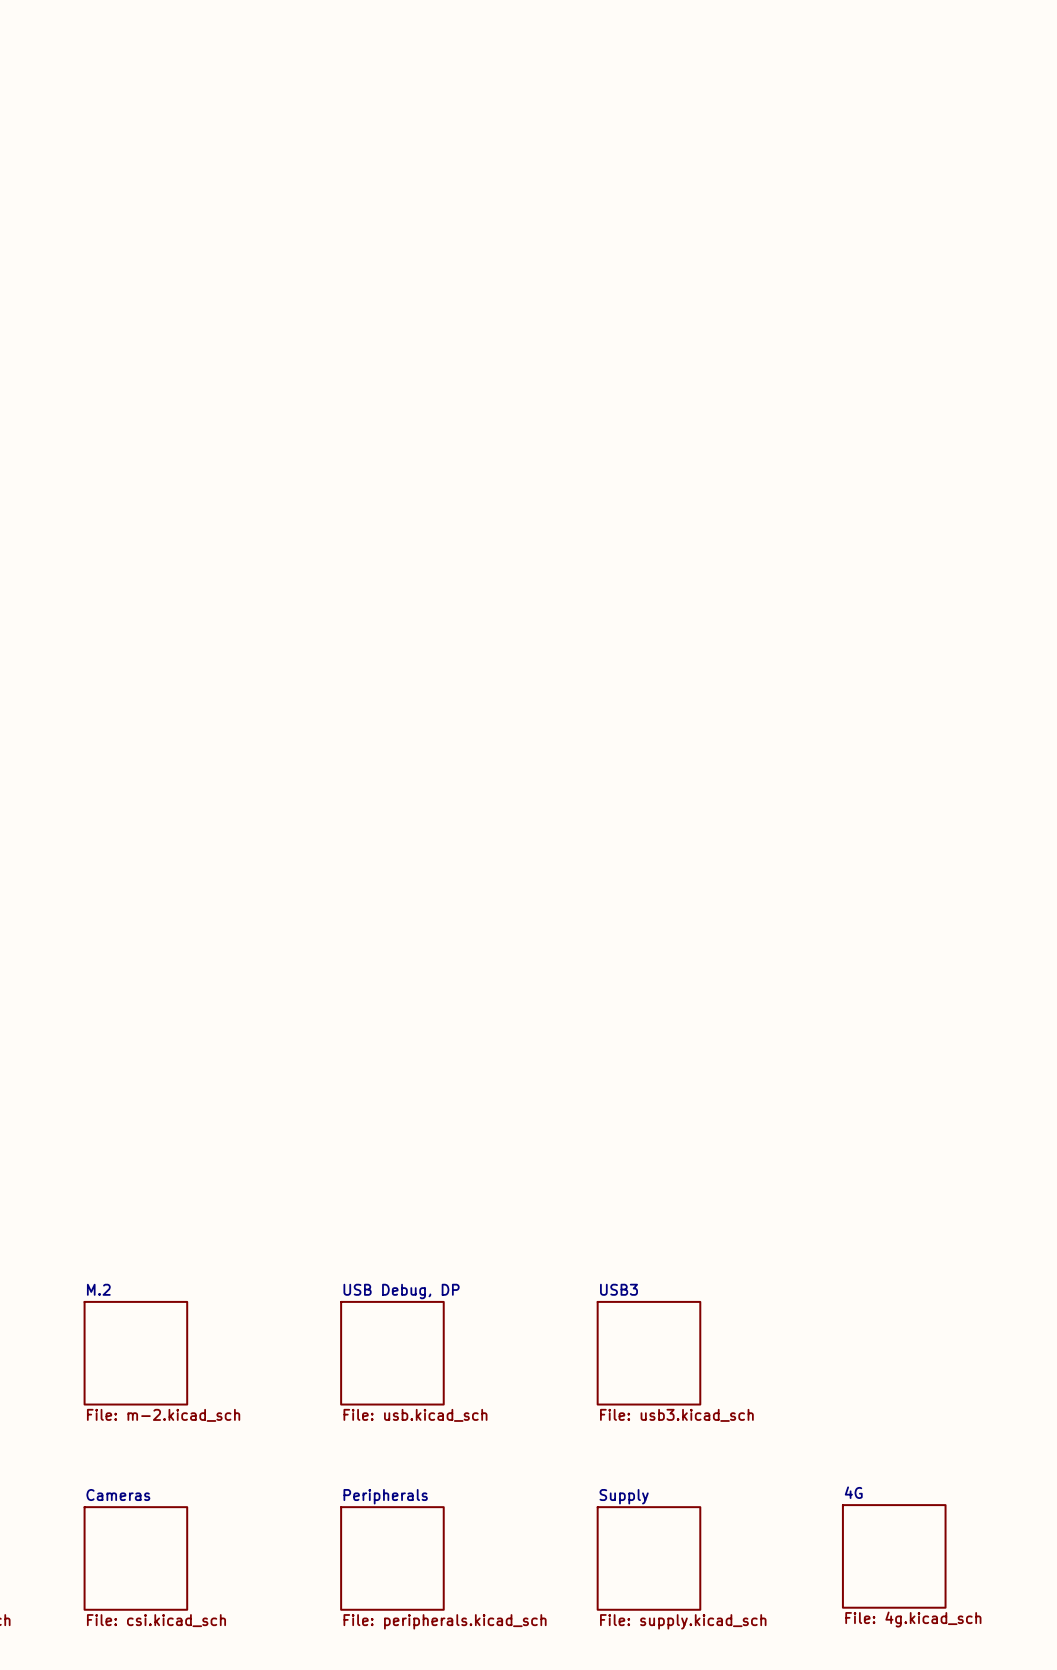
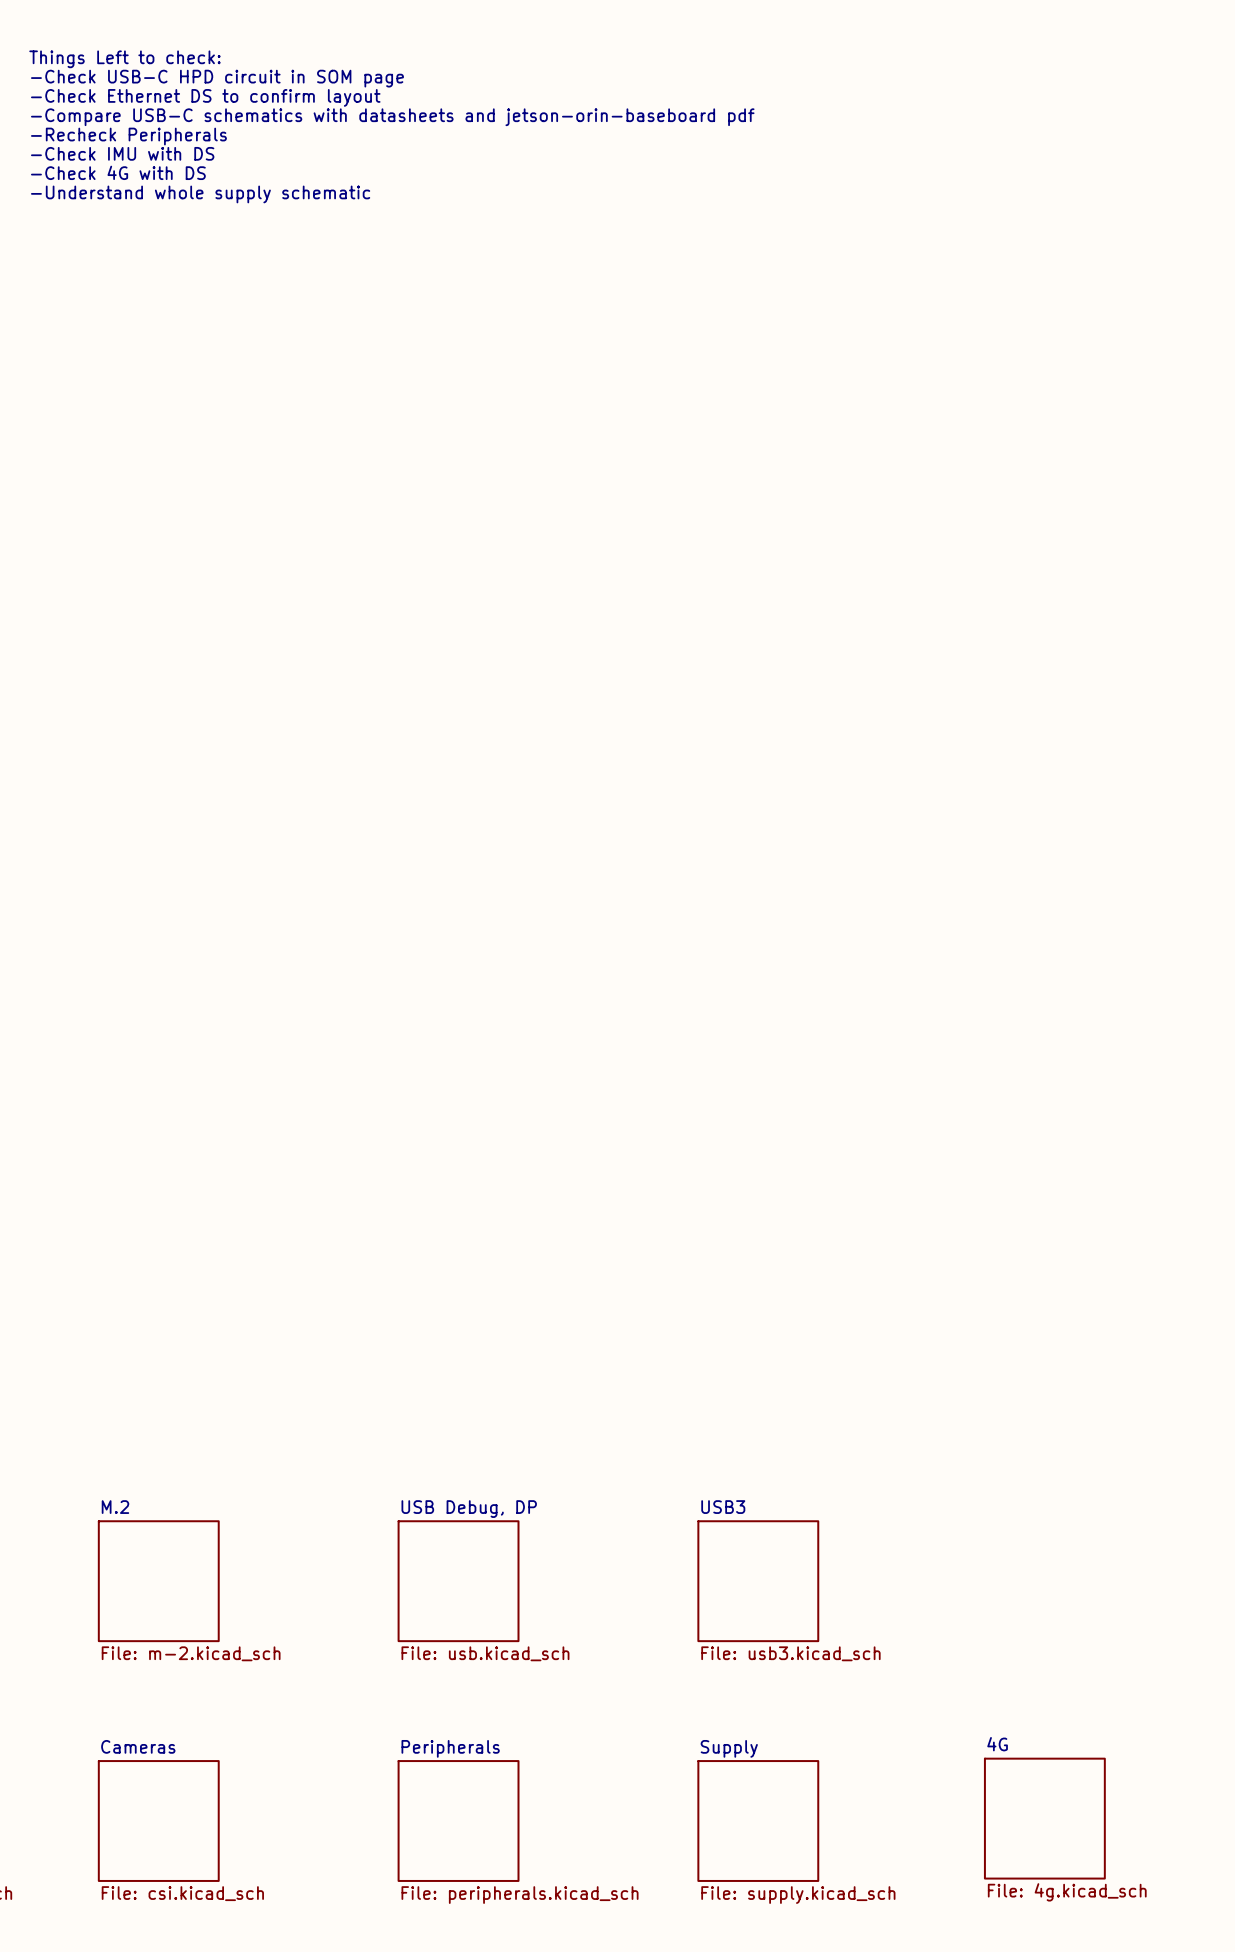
text: none -> Things Left to check: (124, 59)
text: none -> -Check USB-C HPD circuit in SOM page (217, 78)
text: none -> -Check Ethernet DS to confirm layout (205, 97)
text: none -> -Compare USB-C schematics with datasheets and jetson-orin-baseboard pdf (392, 117)
text: none -> -Recheck Peripherals (128, 136)
text: none -> -Check IMU with DS (122, 153)
text: none -> -Check 4G with DS (118, 172)
text: none -> -Understand whole supply schematic (200, 194)

